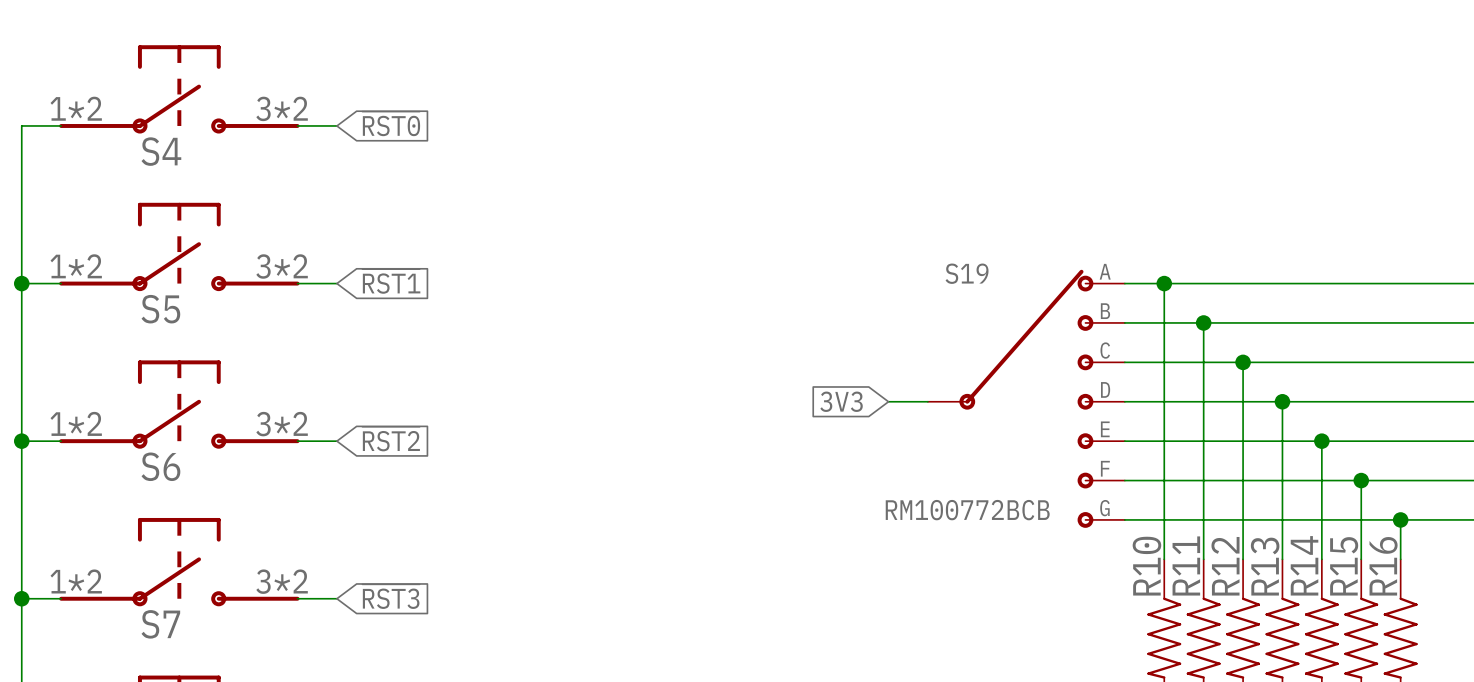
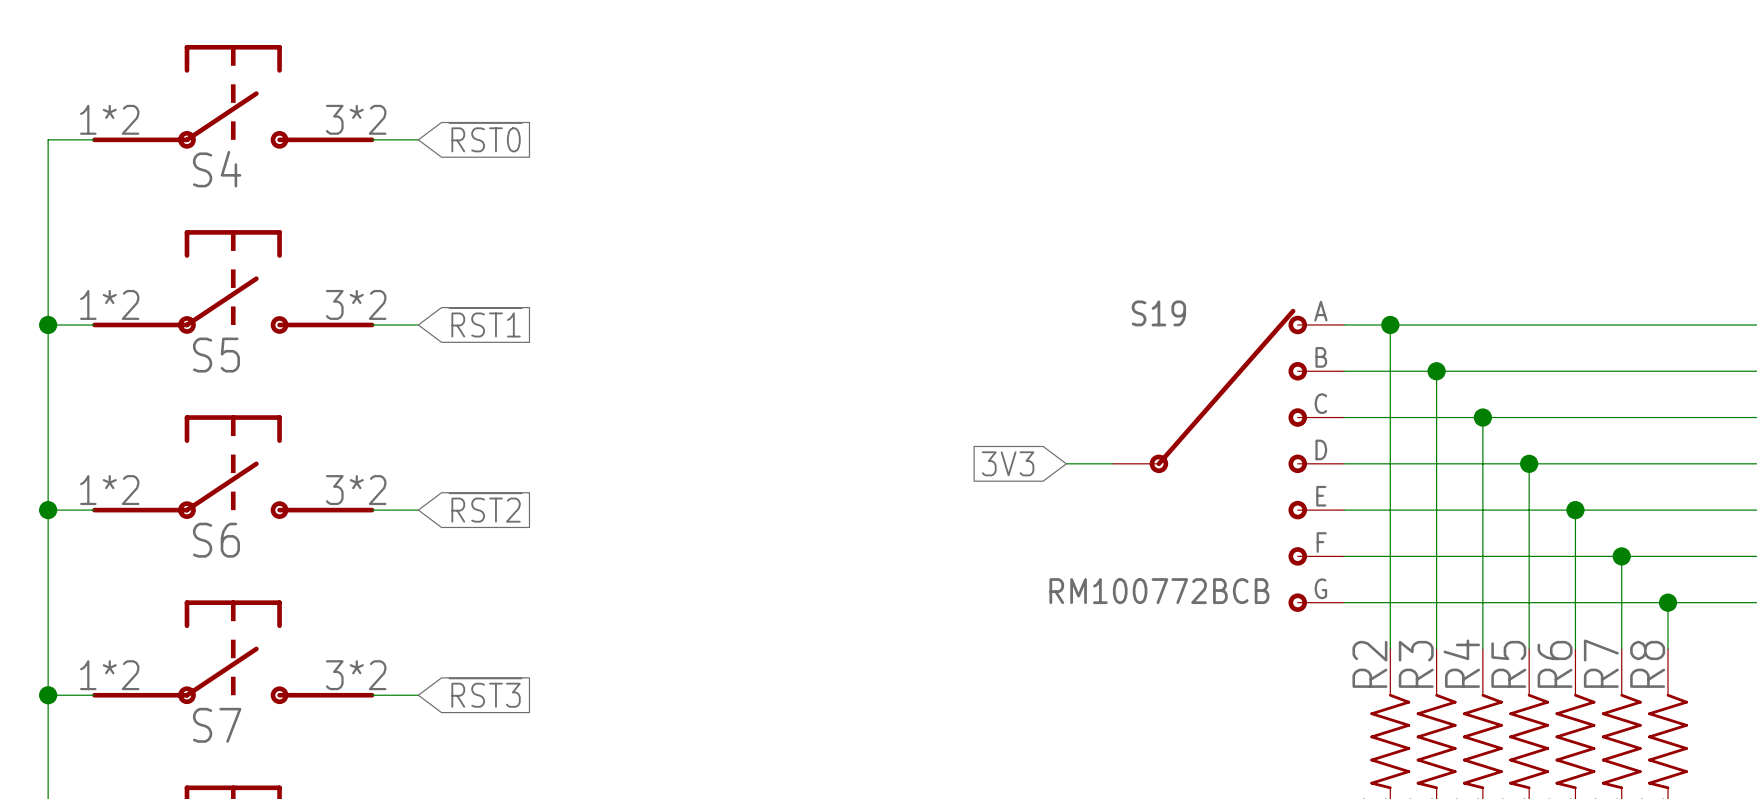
R11 name: R11 (1186, 565) -> R3 (1416, 664)
R14 name: R14 (1304, 565) -> R6 (1555, 664)
R10 name: R10 (1146, 566) -> R2 (1369, 664)
R12 name: R12 (1225, 566) -> R4 (1461, 663)
R13 name: R13 (1265, 566) -> R5 (1508, 664)
R15 name: R15 (1344, 566) -> R7 (1601, 663)
R16 name: R16 (1383, 566) -> R8 (1647, 664)

